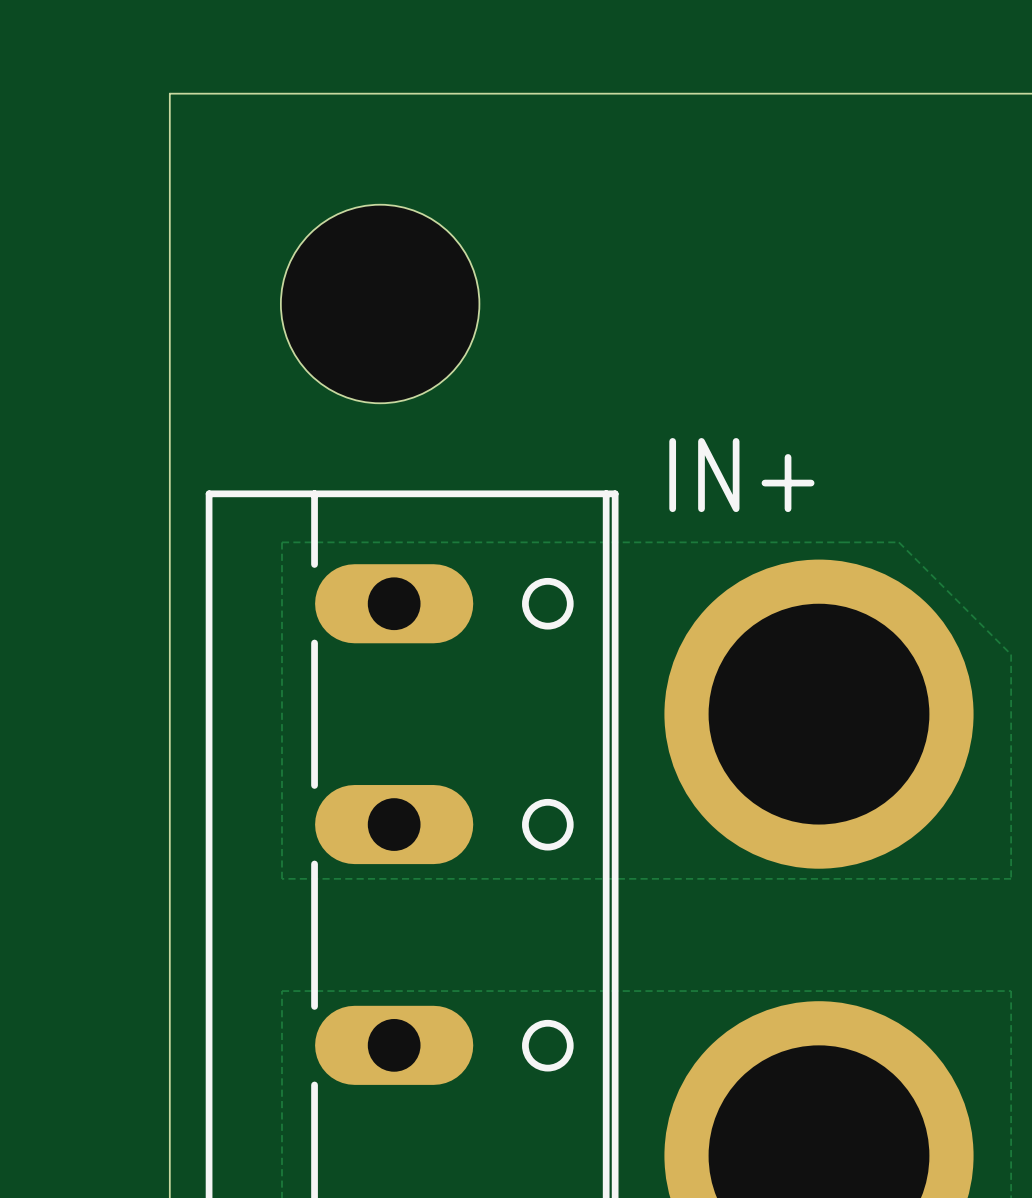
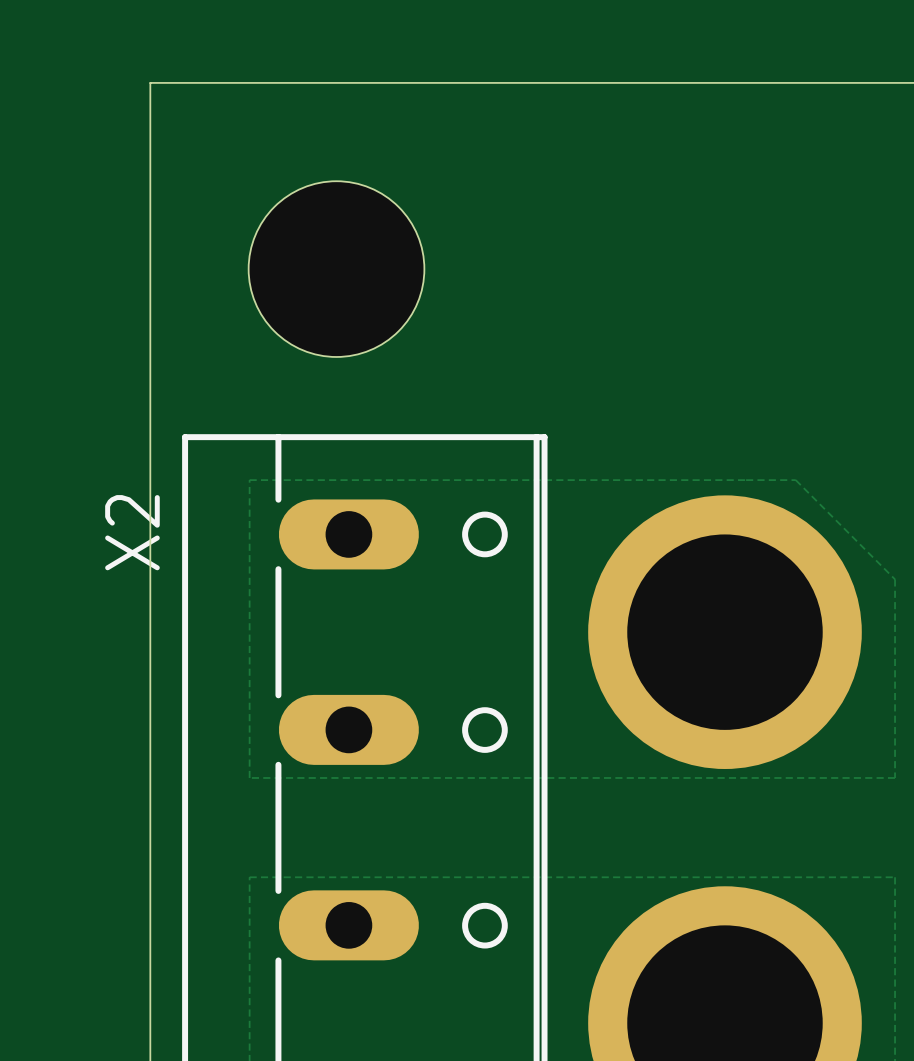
text: IN+ (741, 475) -> none
X2 name: none -> X2 (132, 532)

